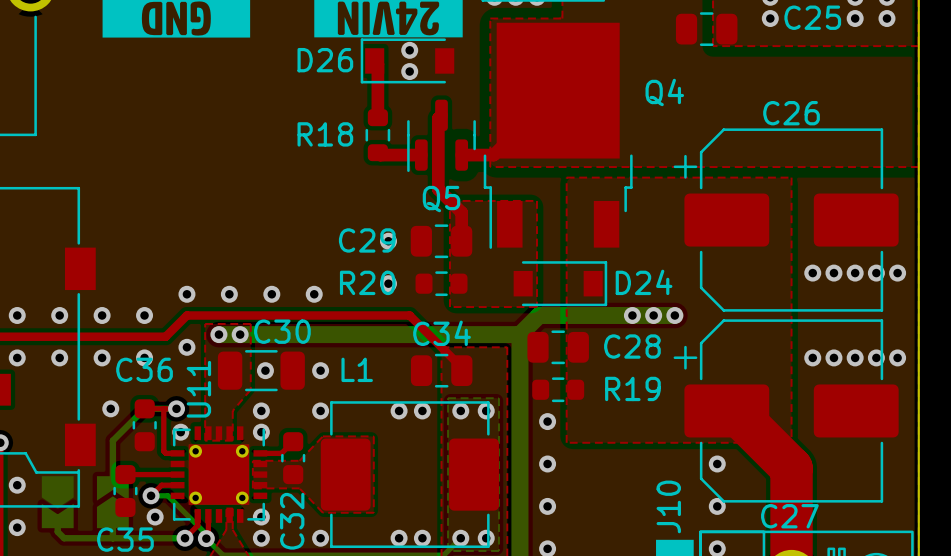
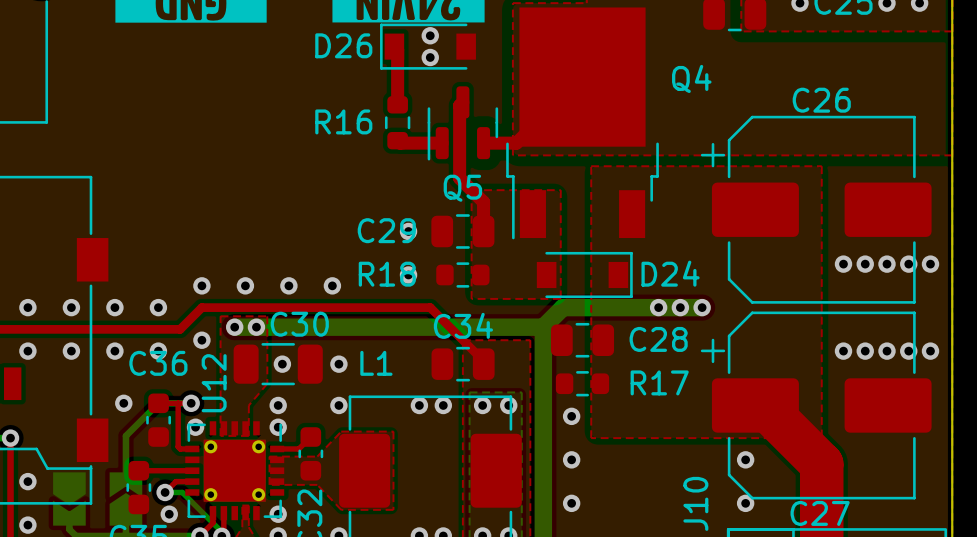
R18 name: R18 (325, 134) -> R16 (343, 121)
R20 name: R20 (367, 282) -> R18 (387, 274)
R19 name: R19 (632, 388) -> R17 (659, 382)
U11 name: U11 (198, 389) -> U12 (214, 383)

